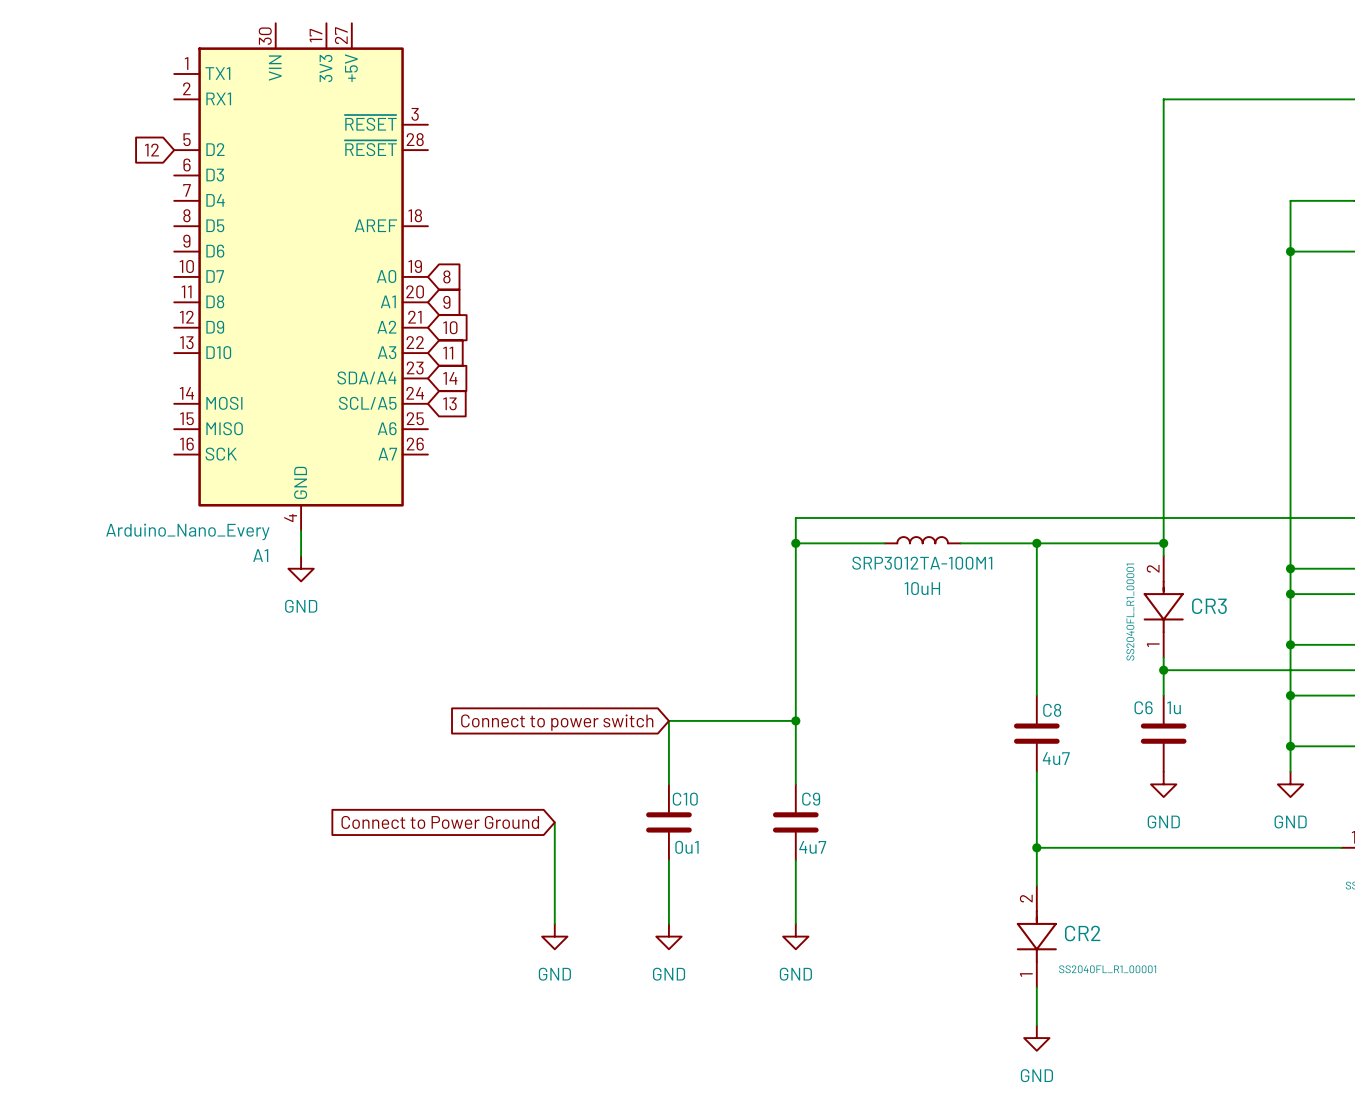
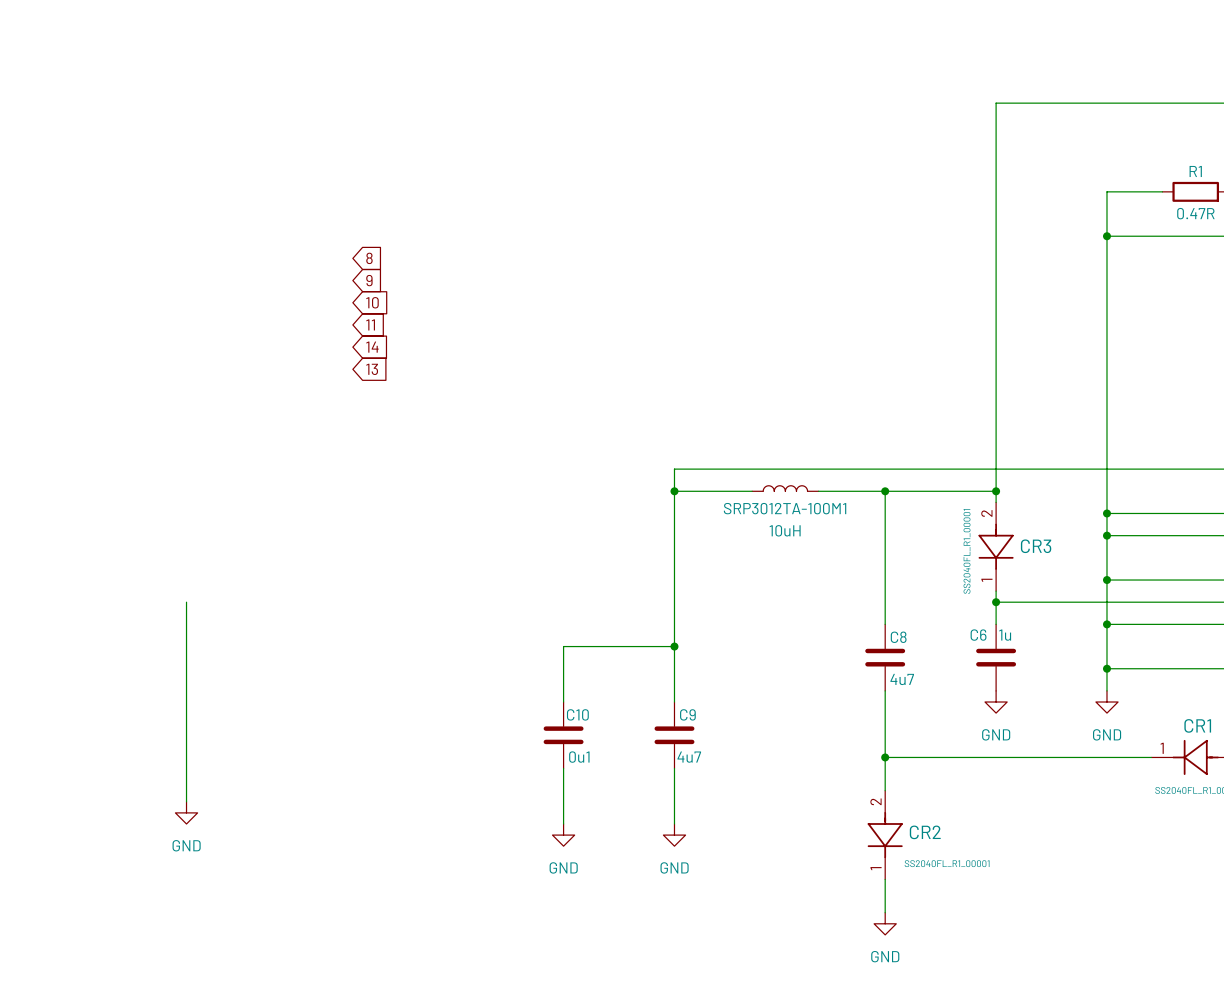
global label: 12 (151, 150) -> none
A1: Arduino_Nano_Every (301, 276) -> none
wire: (301, 530) (301, 556) -> none
power symbol: GND (301, 568) -> none
wire: none -> (186, 602) (186, 801)
global label: Connect to power switch (557, 722) -> none
global label: Connect to Power Ground (440, 822) -> none
wire: (554, 822) (554, 923) -> none
power symbol: none -> GND (186, 812)
power symbol: GND (554, 936) -> none

